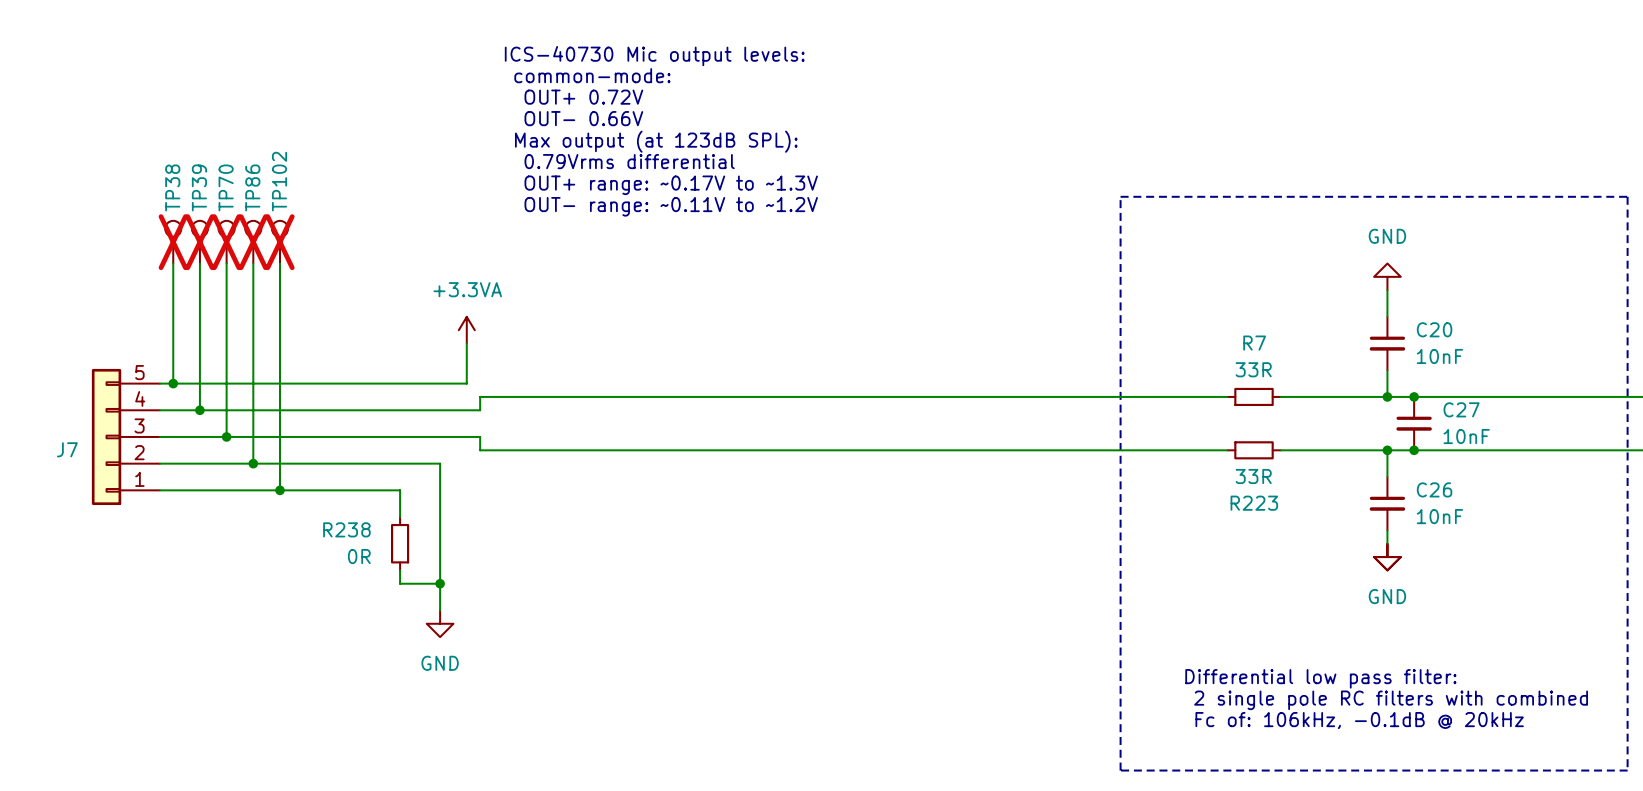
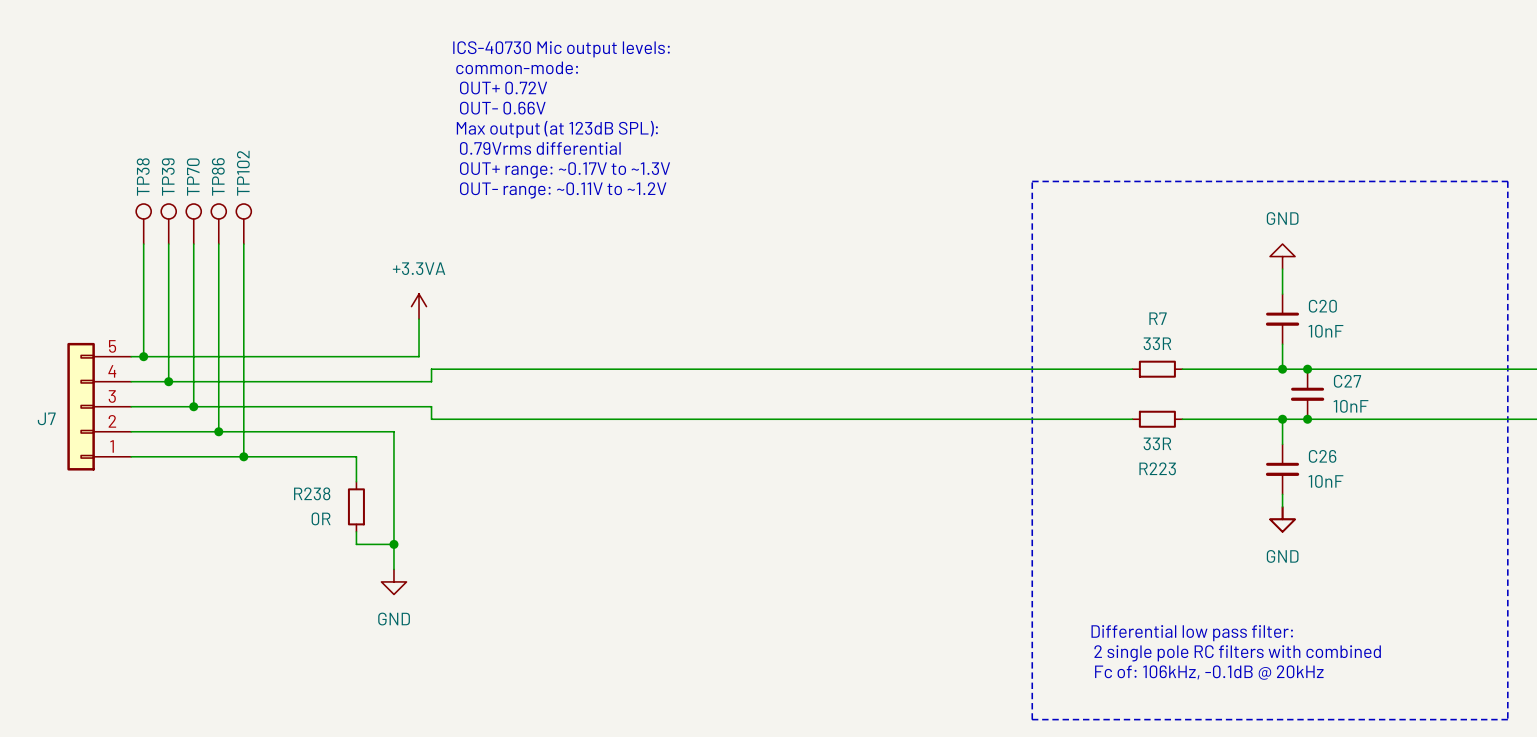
TP38 do-not-place cross: (173, 242) -> none
TP39 do-not-place cross: (199, 242) -> none
TP70 do-not-place cross: (226, 242) -> none
TP86 do-not-place cross: (253, 242) -> none
TP102 do-not-place cross: (279, 242) -> none

